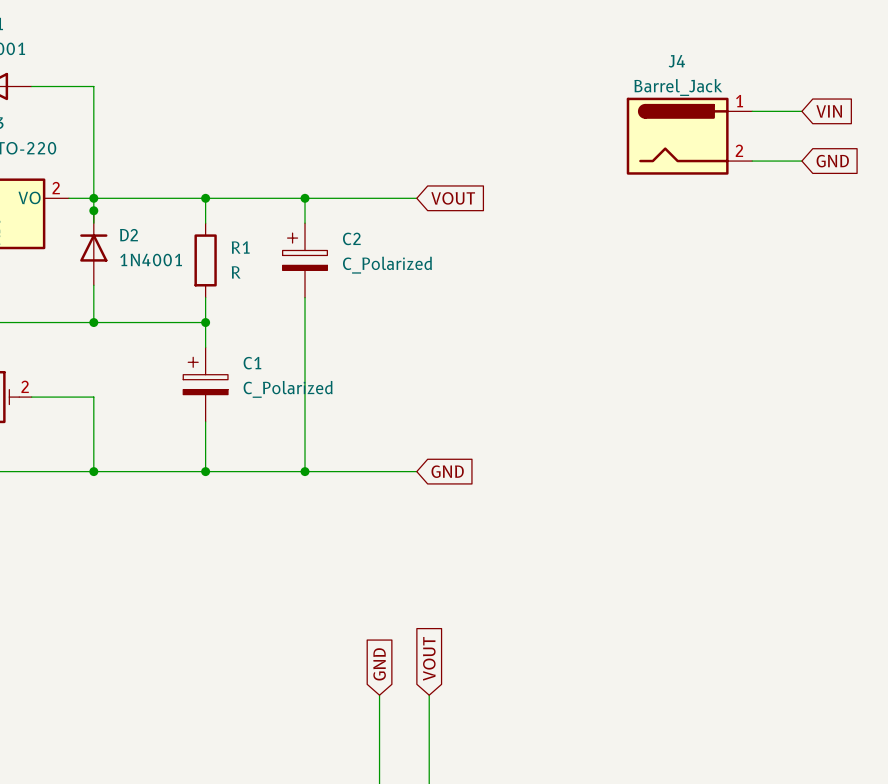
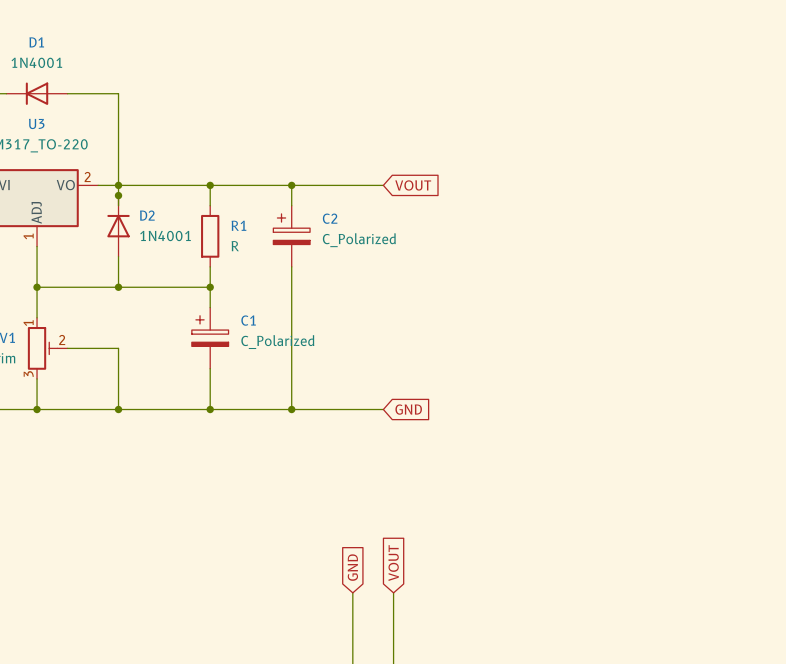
wire: (752, 111) (801, 111) -> none
global label: VIN (829, 111) -> none
J4: Barrel_Jack (689, 136) -> none
wire: (752, 161) (801, 161) -> none
global label: GND (832, 161) -> none

